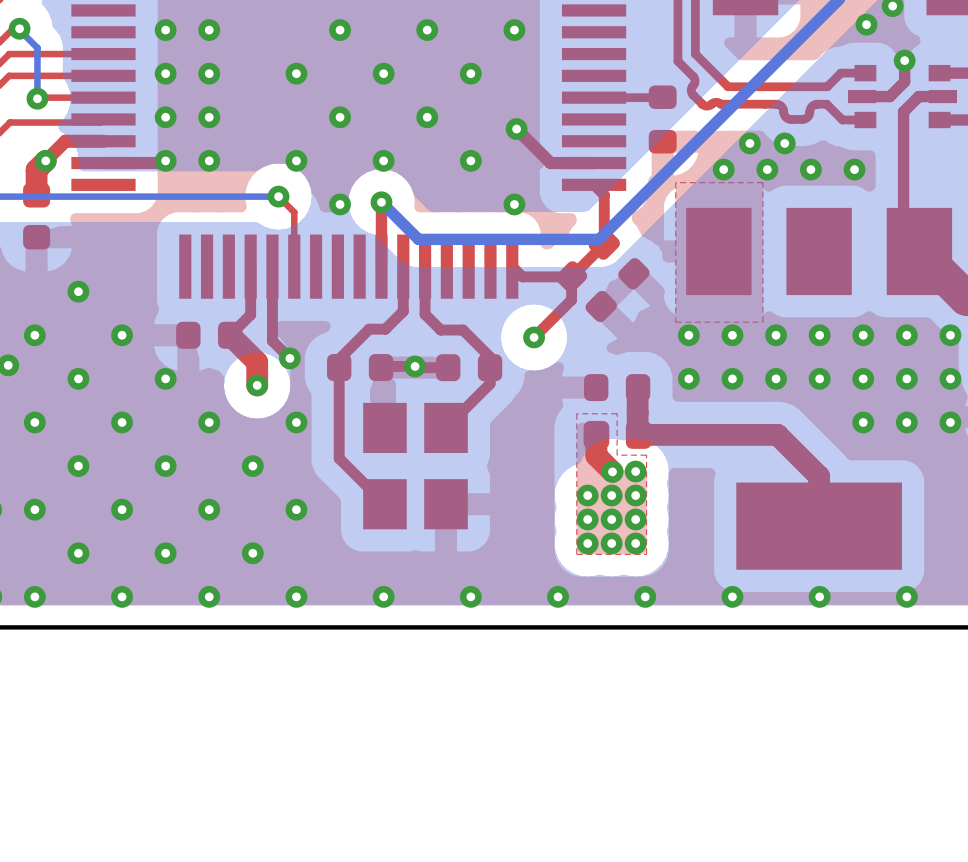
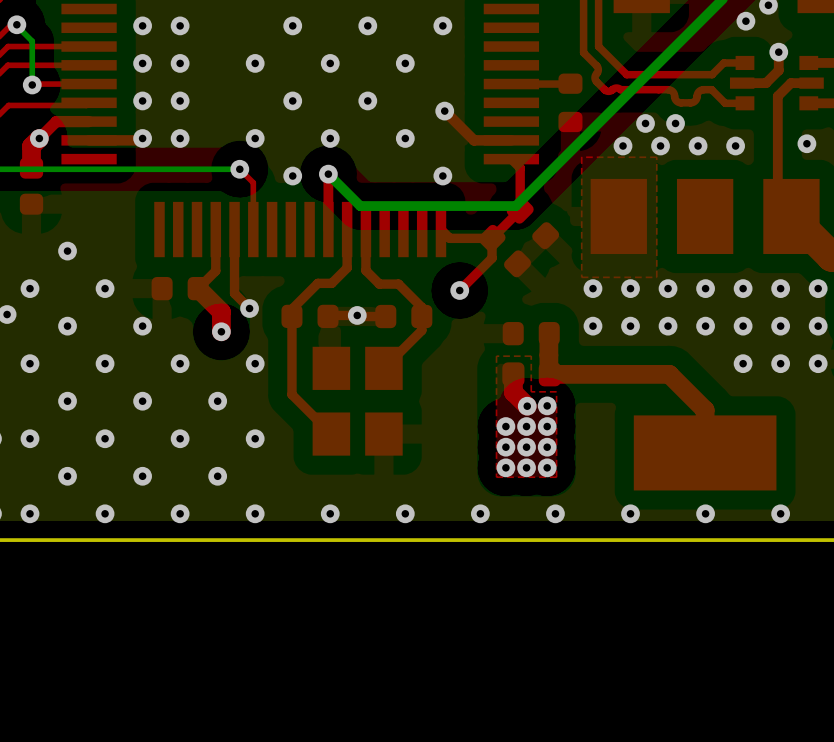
via: none -> (806, 143)

